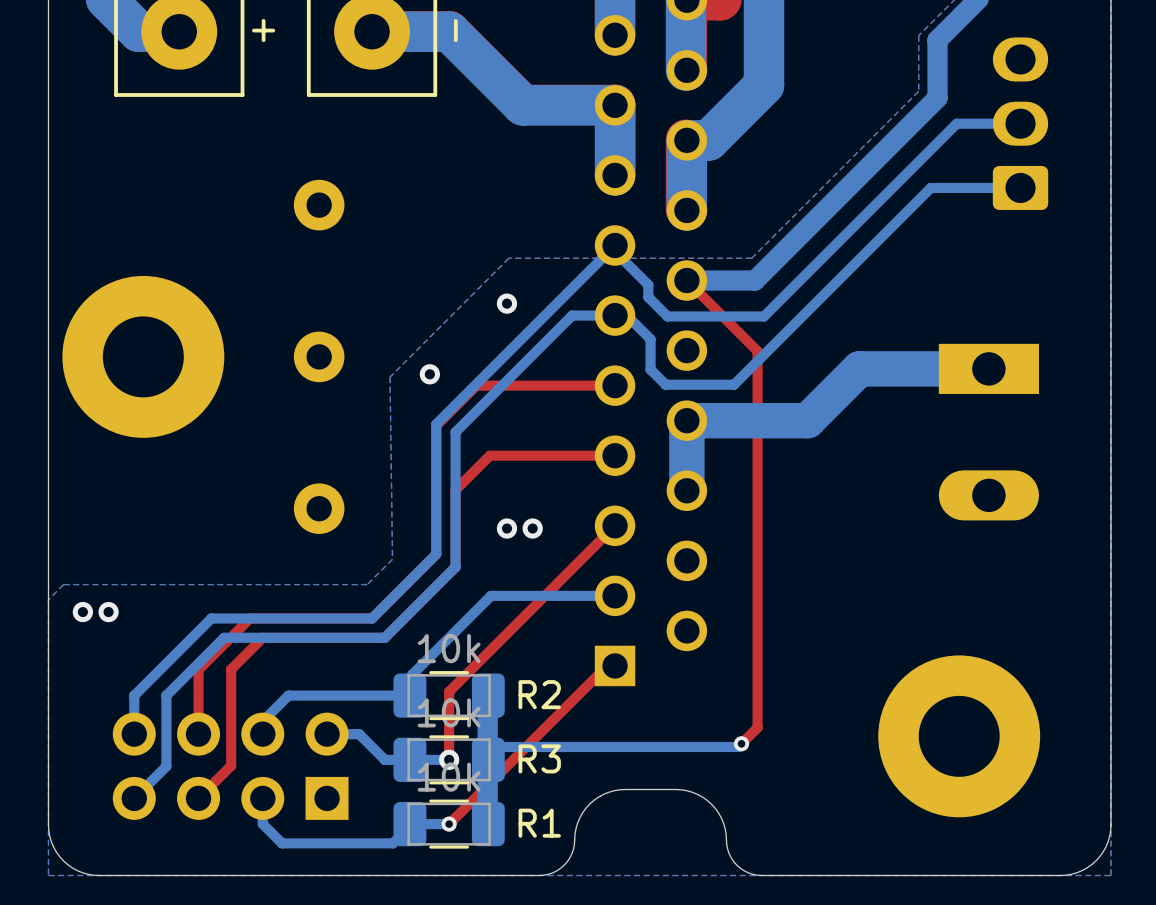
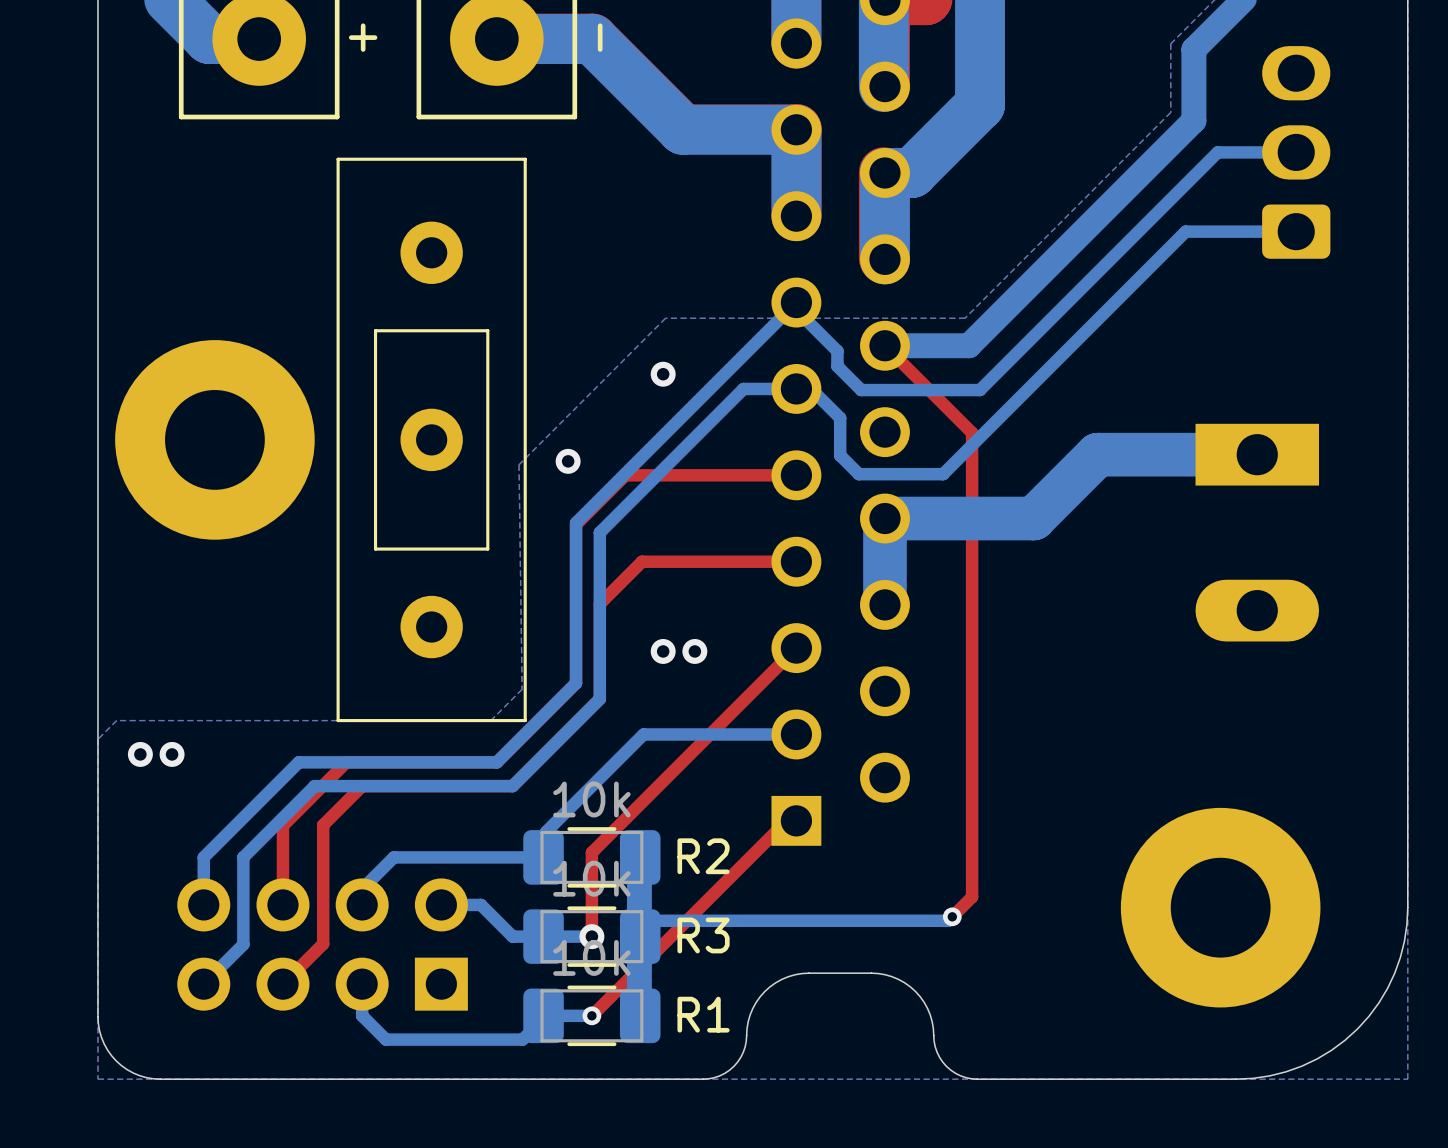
line: none -> (525, 159) (525, 720) (338, 720) (338, 159) (525, 159)
line: none -> (487, 330) (375, 330) (375, 549) (487, 549) (487, 330)
board edge: (1110, 736) (1110, 830) (1105, 846) (1096, 860) (1082, 870) (1066, 875) (971, 875) -> (1407, 907) (1404, 941) (1394, 973) (1378, 1002) (1357, 1028) (1331, 1050) (1301, 1066) (1269, 1075) (1236, 1079)

